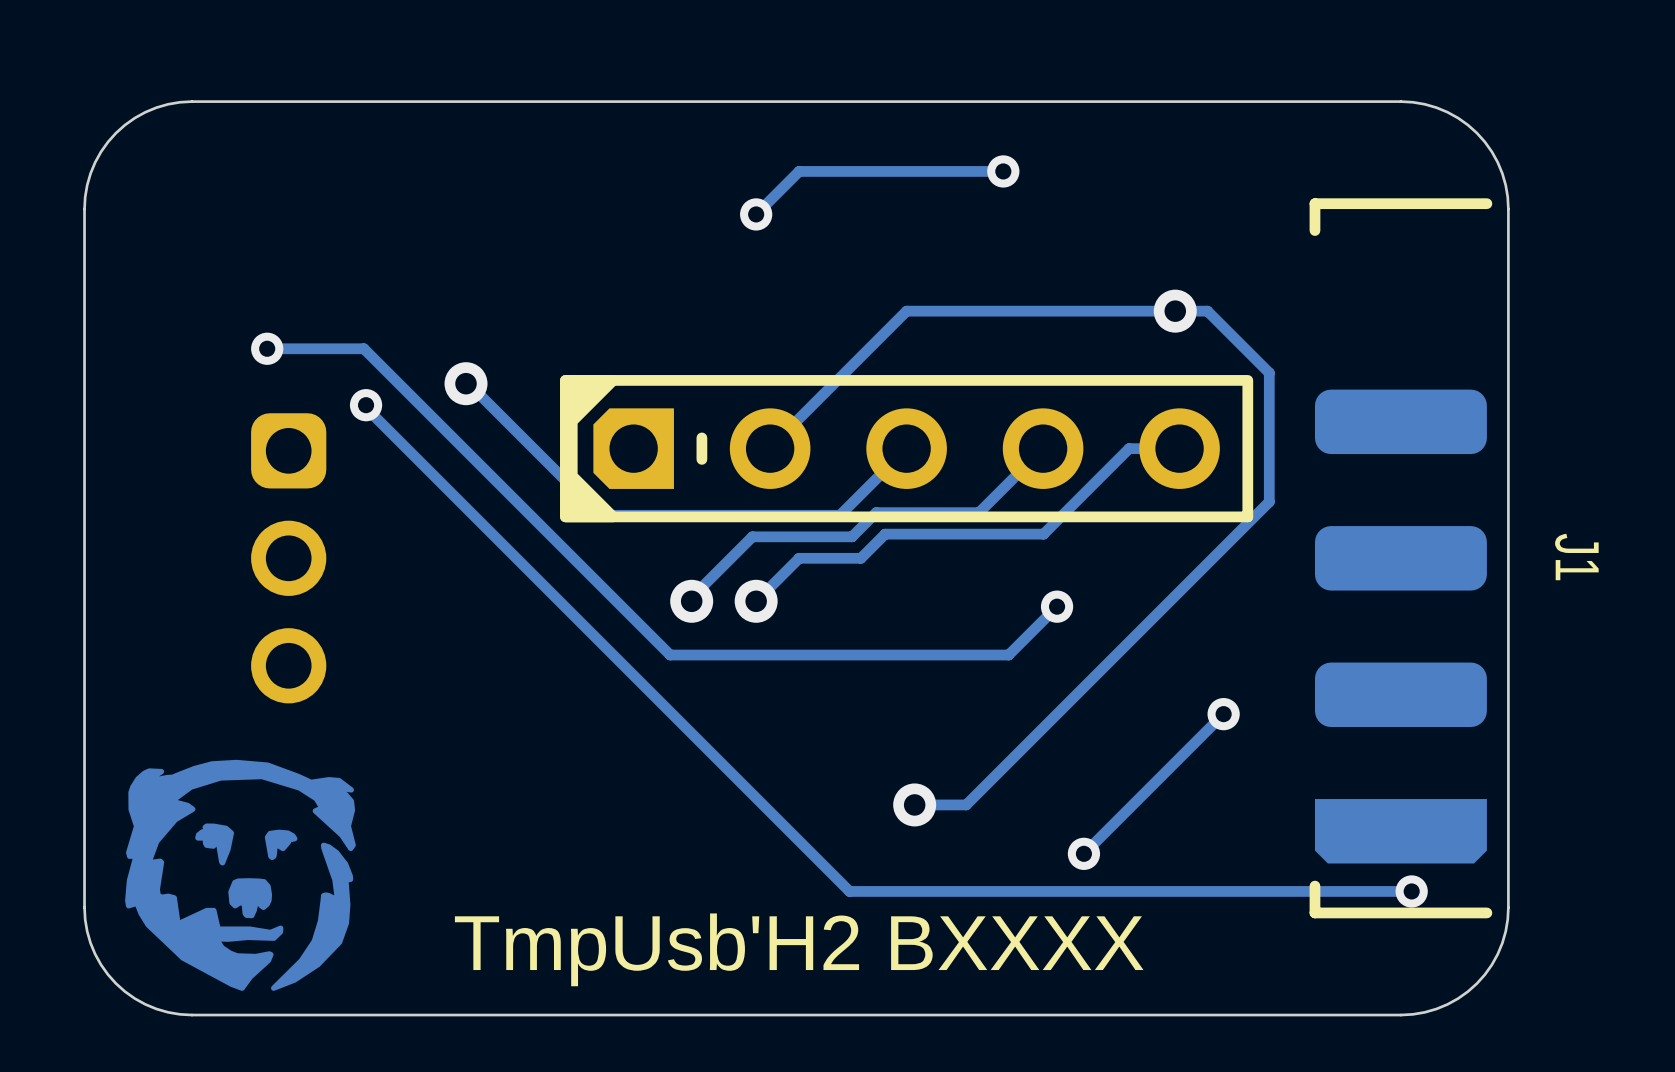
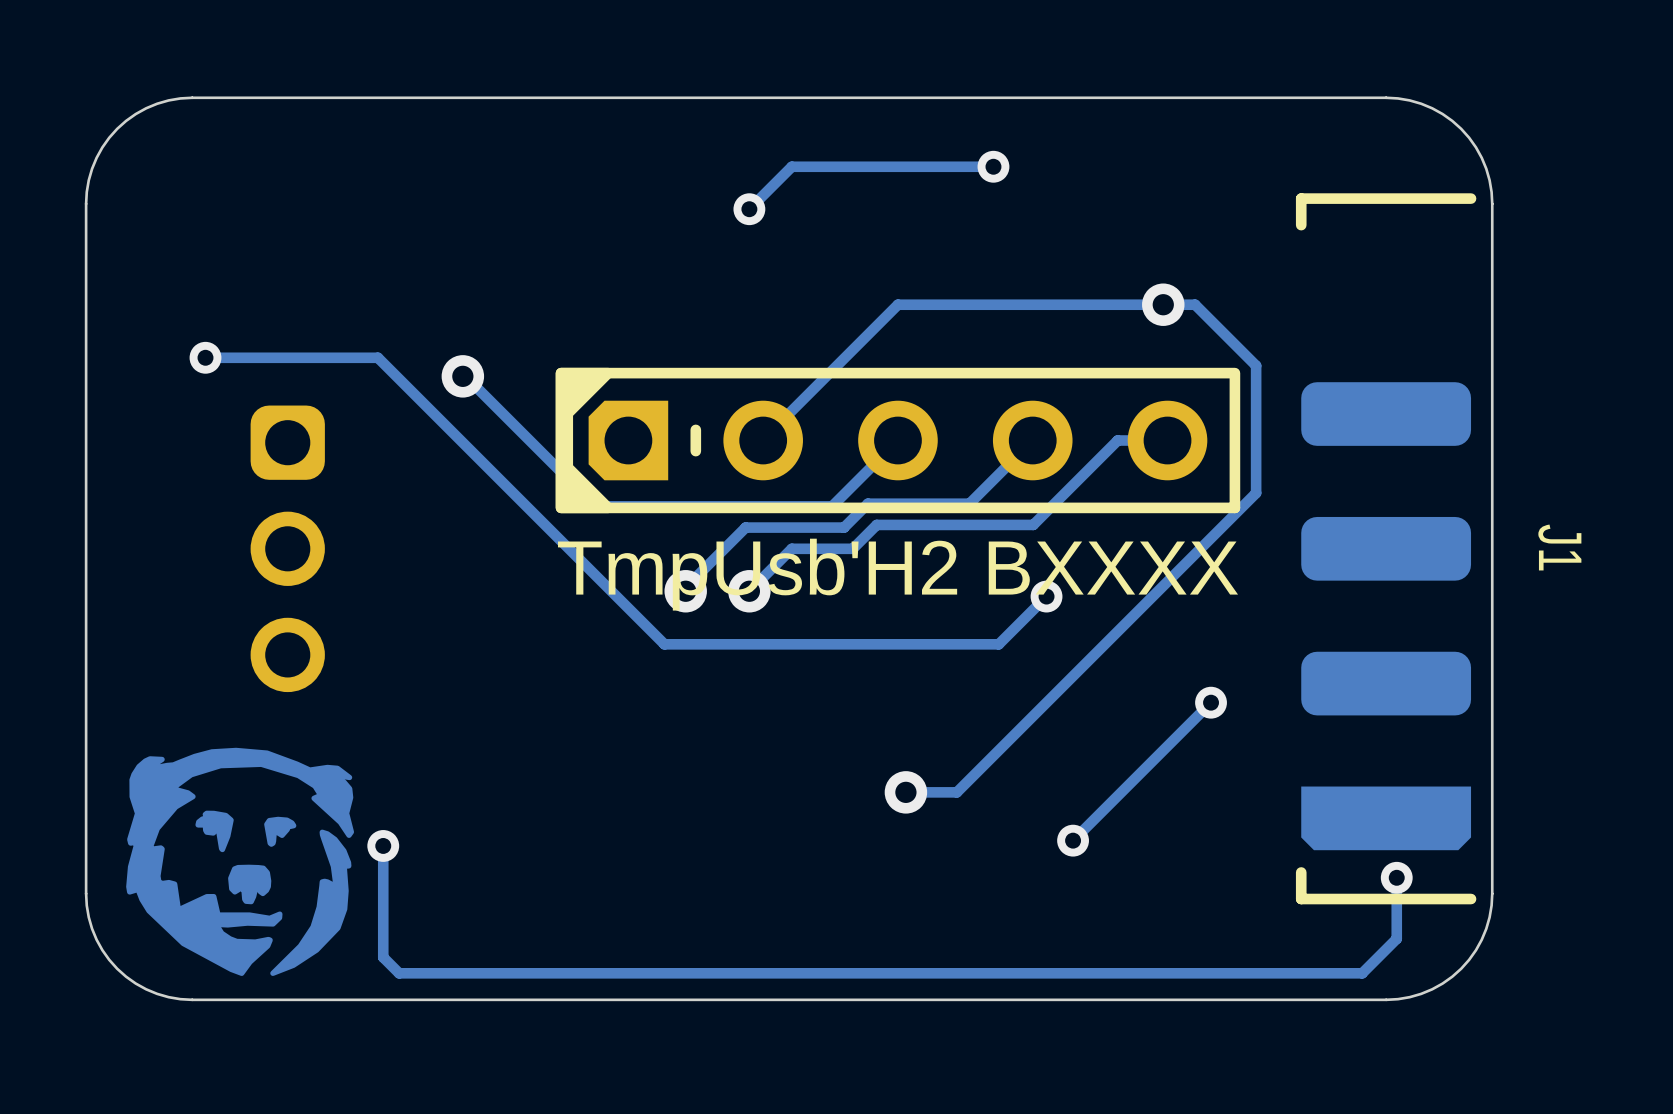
track: (267, 348) (363, 348) (380, 364) -> (205, 357) (377, 357)
via position: (267, 348) -> (205, 357)
track: (366, 405) (366, 407) (849, 891) (1411, 891) -> (383, 845) (383, 957) (399, 973) (1362, 973) (1396, 938) (1396, 877)
via: (366, 405) -> none
via: none -> (383, 845)
text position: TmpUsb'H2 BXXXX (799, 949) -> TmpUsb'H2 BXXXX (898, 574)

